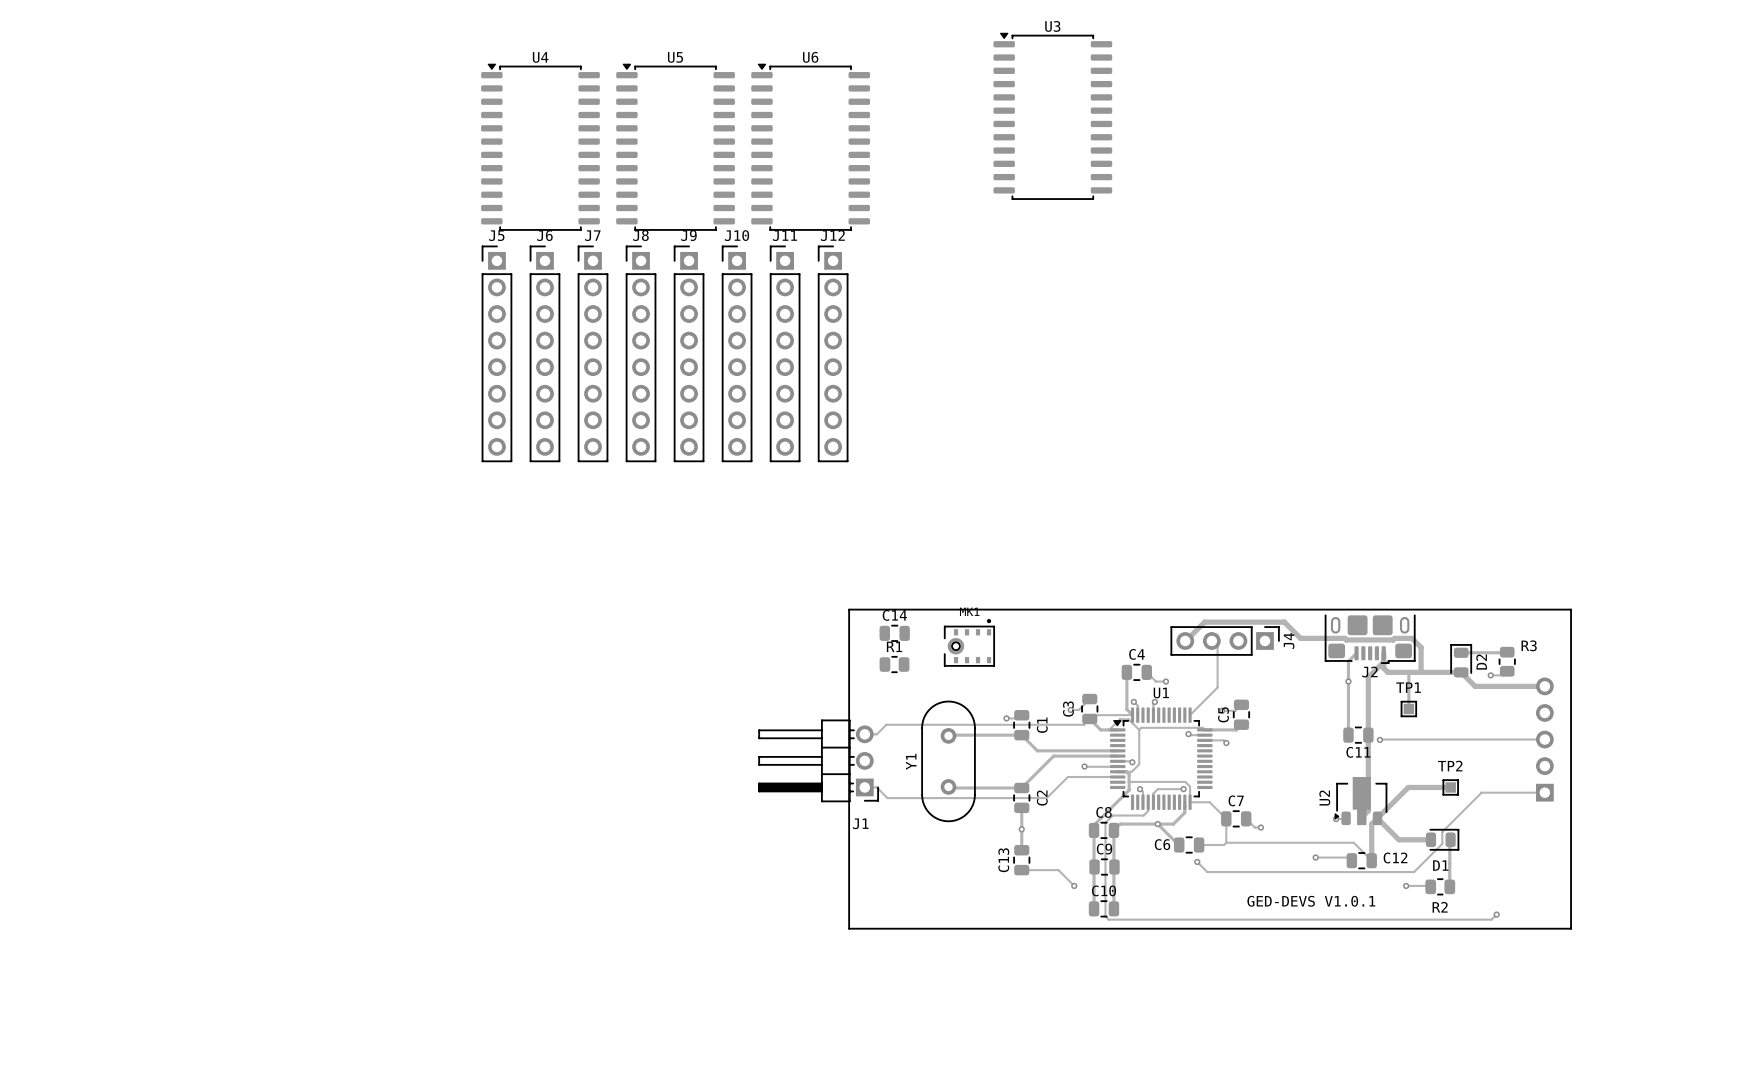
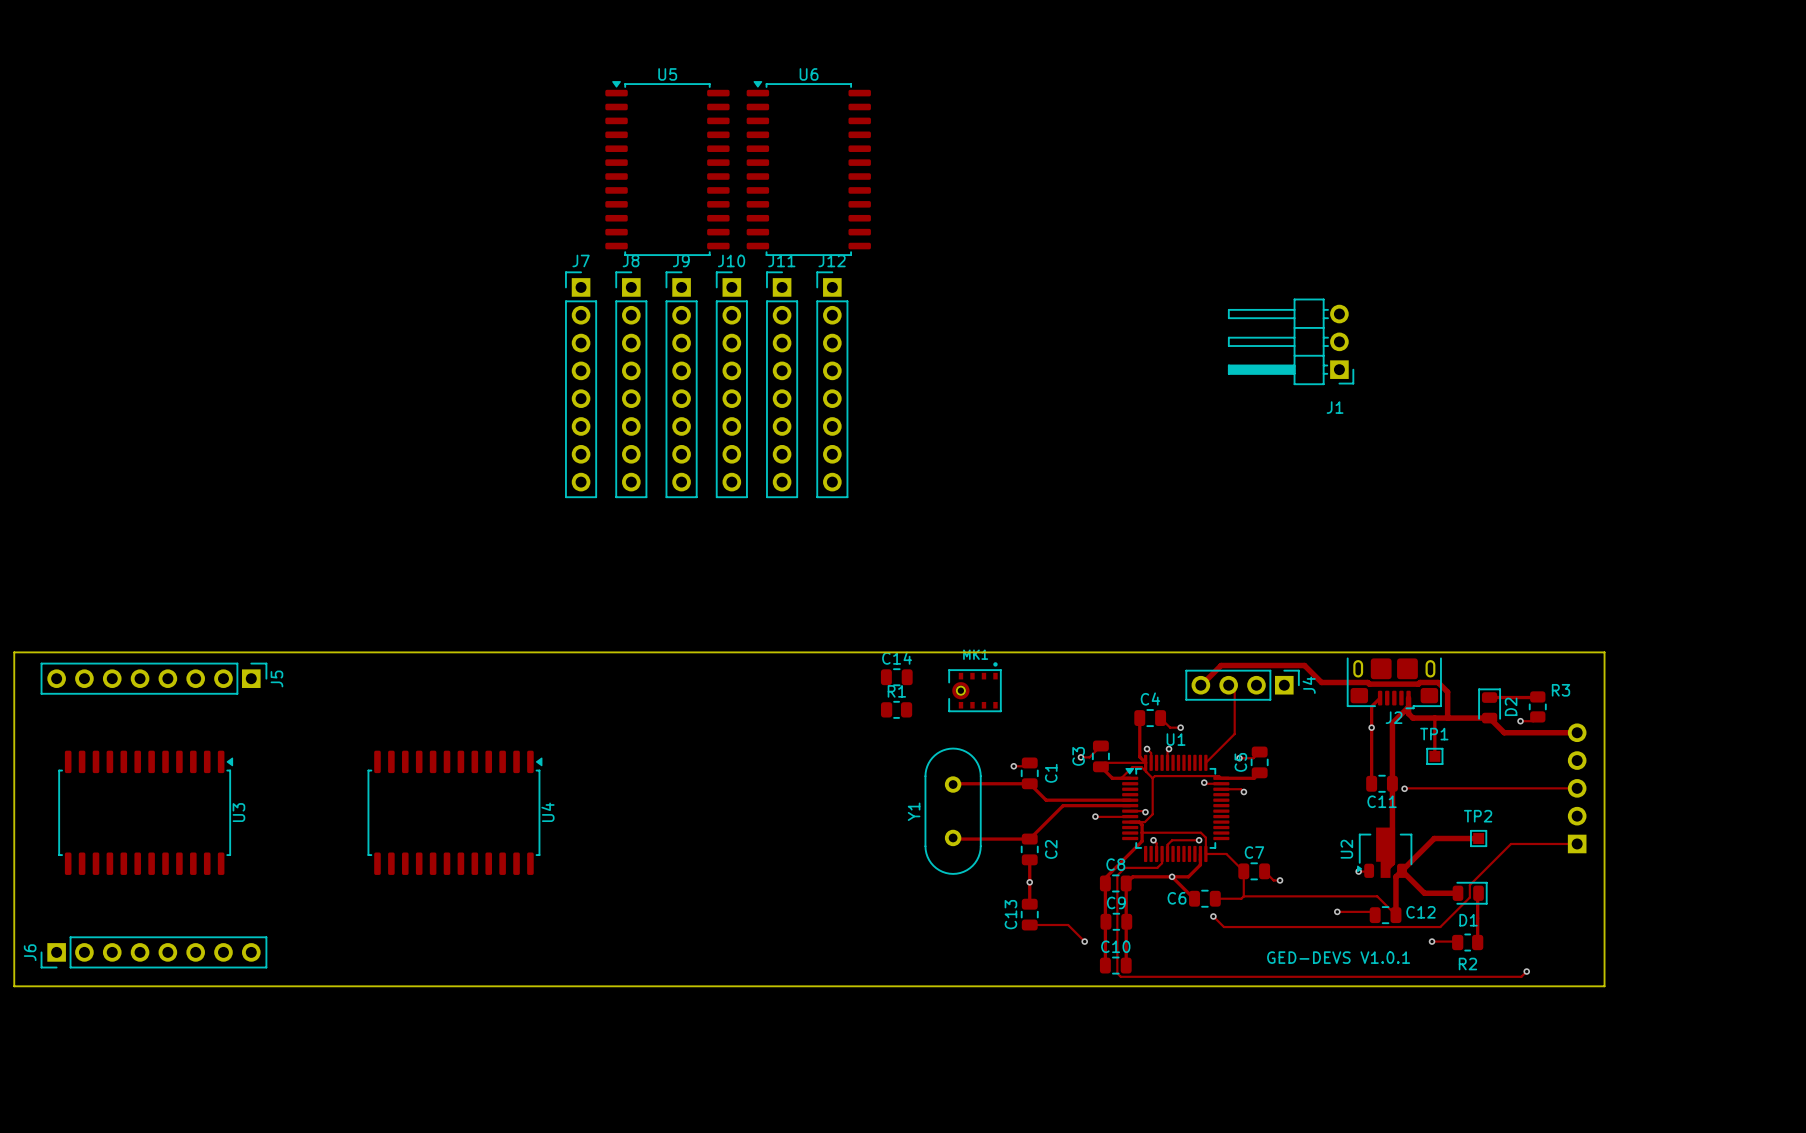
U3 rotation: 0° (1052, 116) -> 90° clockwise (145, 812)
U3 position: (1052, 116) -> (145, 812)
U4 rotation: 0° (540, 147) -> 90° clockwise (455, 812)
U4 position: (540, 147) -> (455, 812)
J5 rotation: 0° (496, 353) -> 90° clockwise (153, 678)
J5 position: (496, 353) -> (153, 678)
J6 rotation: 0° (544, 353) -> 90° counterclockwise (153, 952)
J6 position: (544, 353) -> (153, 952)
board edge: (849, 609) (849, 928) -> (849, 652) (14, 652) (14, 986) (849, 986)
track: (1089, 718) (1083, 724) (886, 724) (876, 734) (864, 734) -> none
J1 position: (818, 760) -> (1291, 341)
track: (1117, 777) (1067, 777) (1046, 798) (887, 798) (876, 787) (864, 787) -> none

